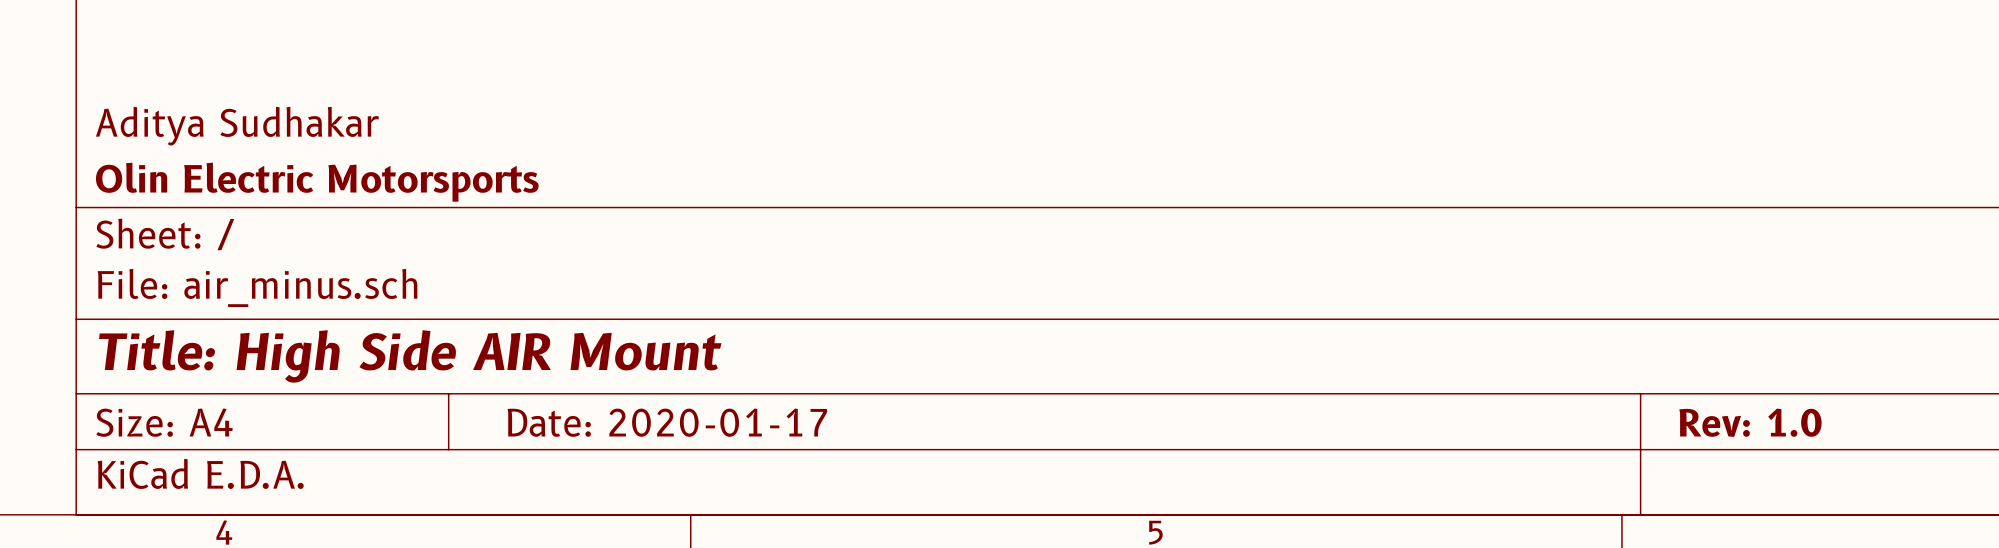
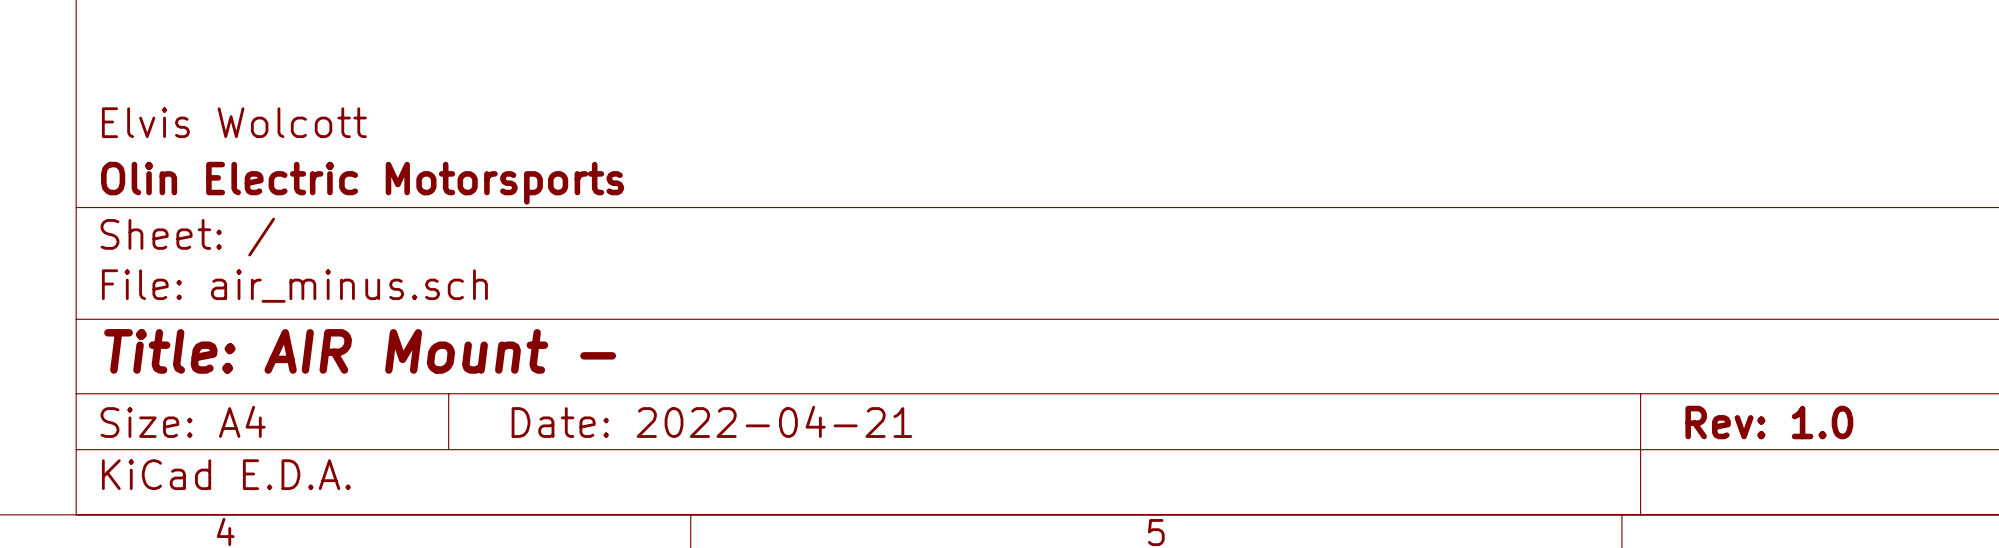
title block: Aditya Sudhakar (237, 126) -> Elvis Wolcott (234, 122)
title block: Title: High Side AIR Mount (410, 356) -> Title: AIR Mount - (360, 351)
title block: Date: 2020-01-17 (667, 422) -> Date: 2022-04-21 (711, 421)

